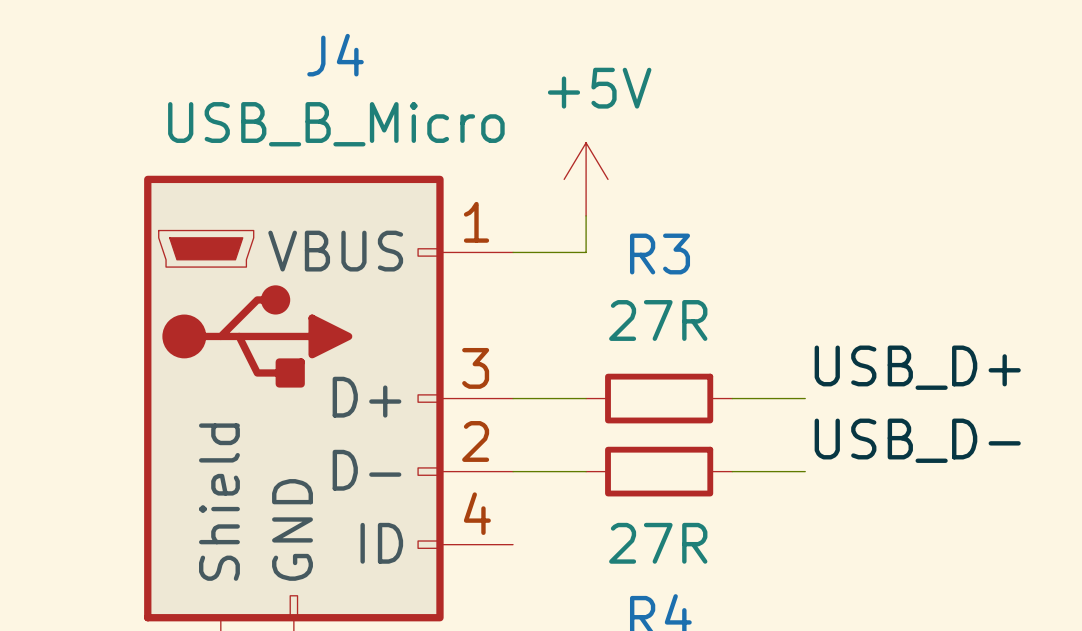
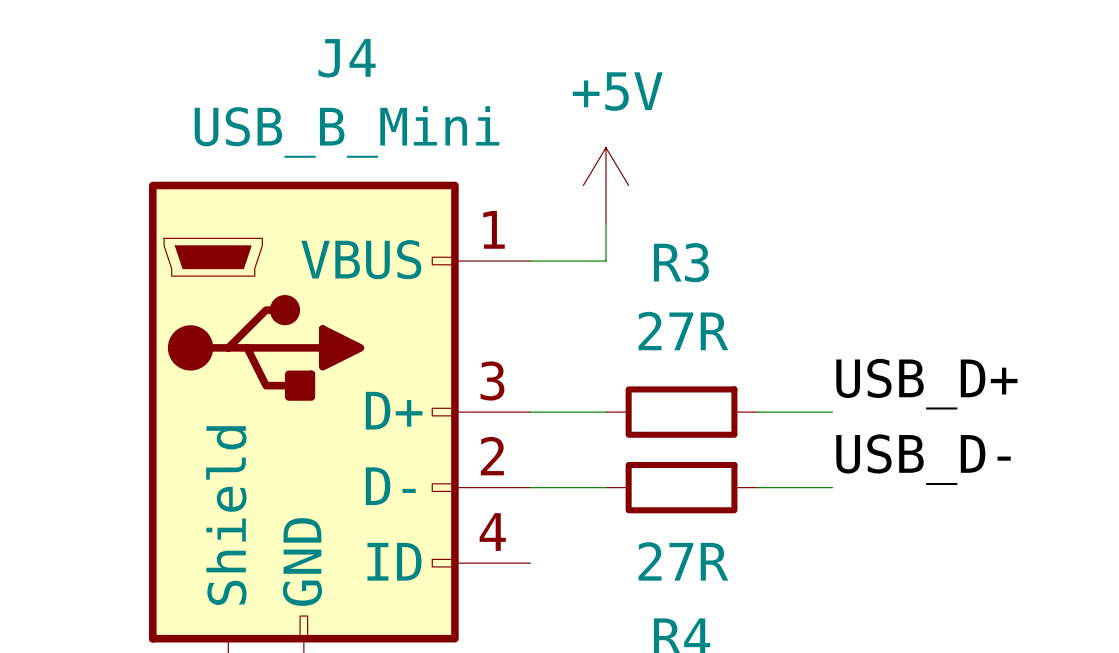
J4 value: USB_B_Micro (336, 124) -> USB_B_Mini (346, 131)

